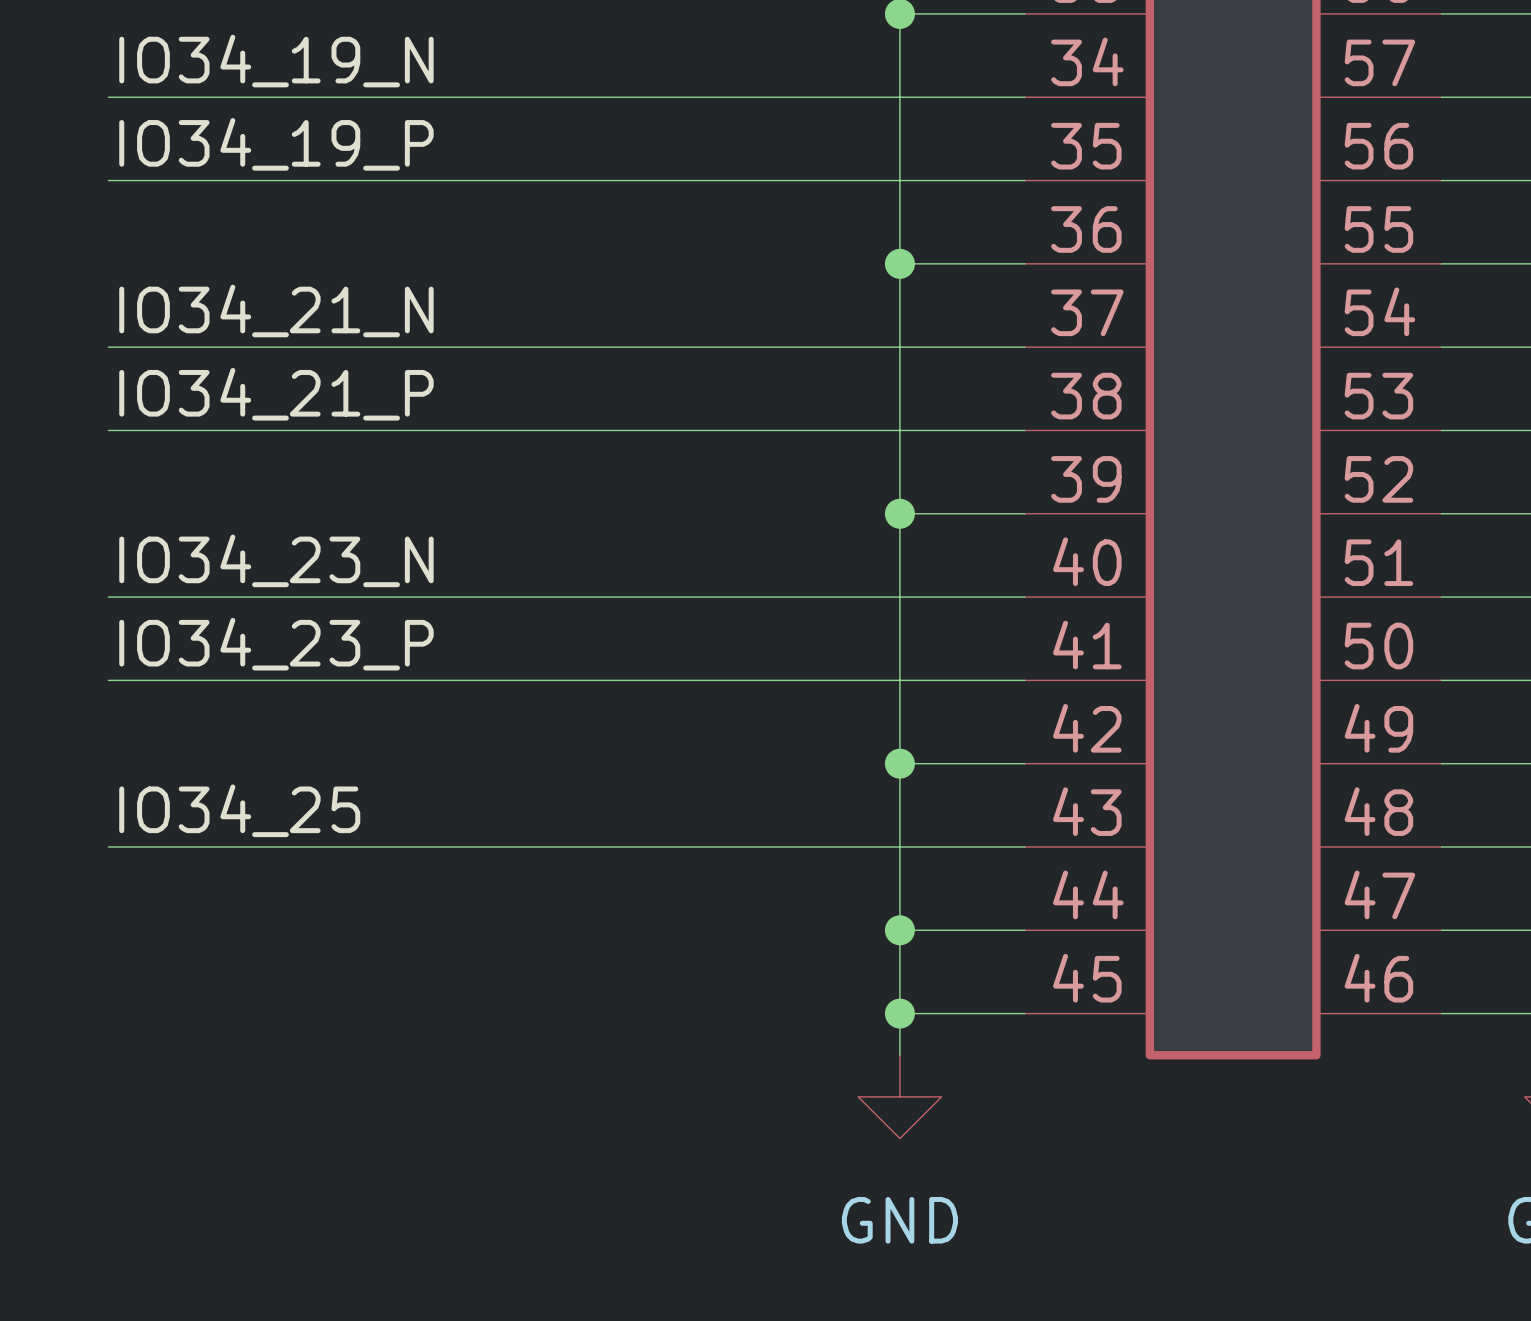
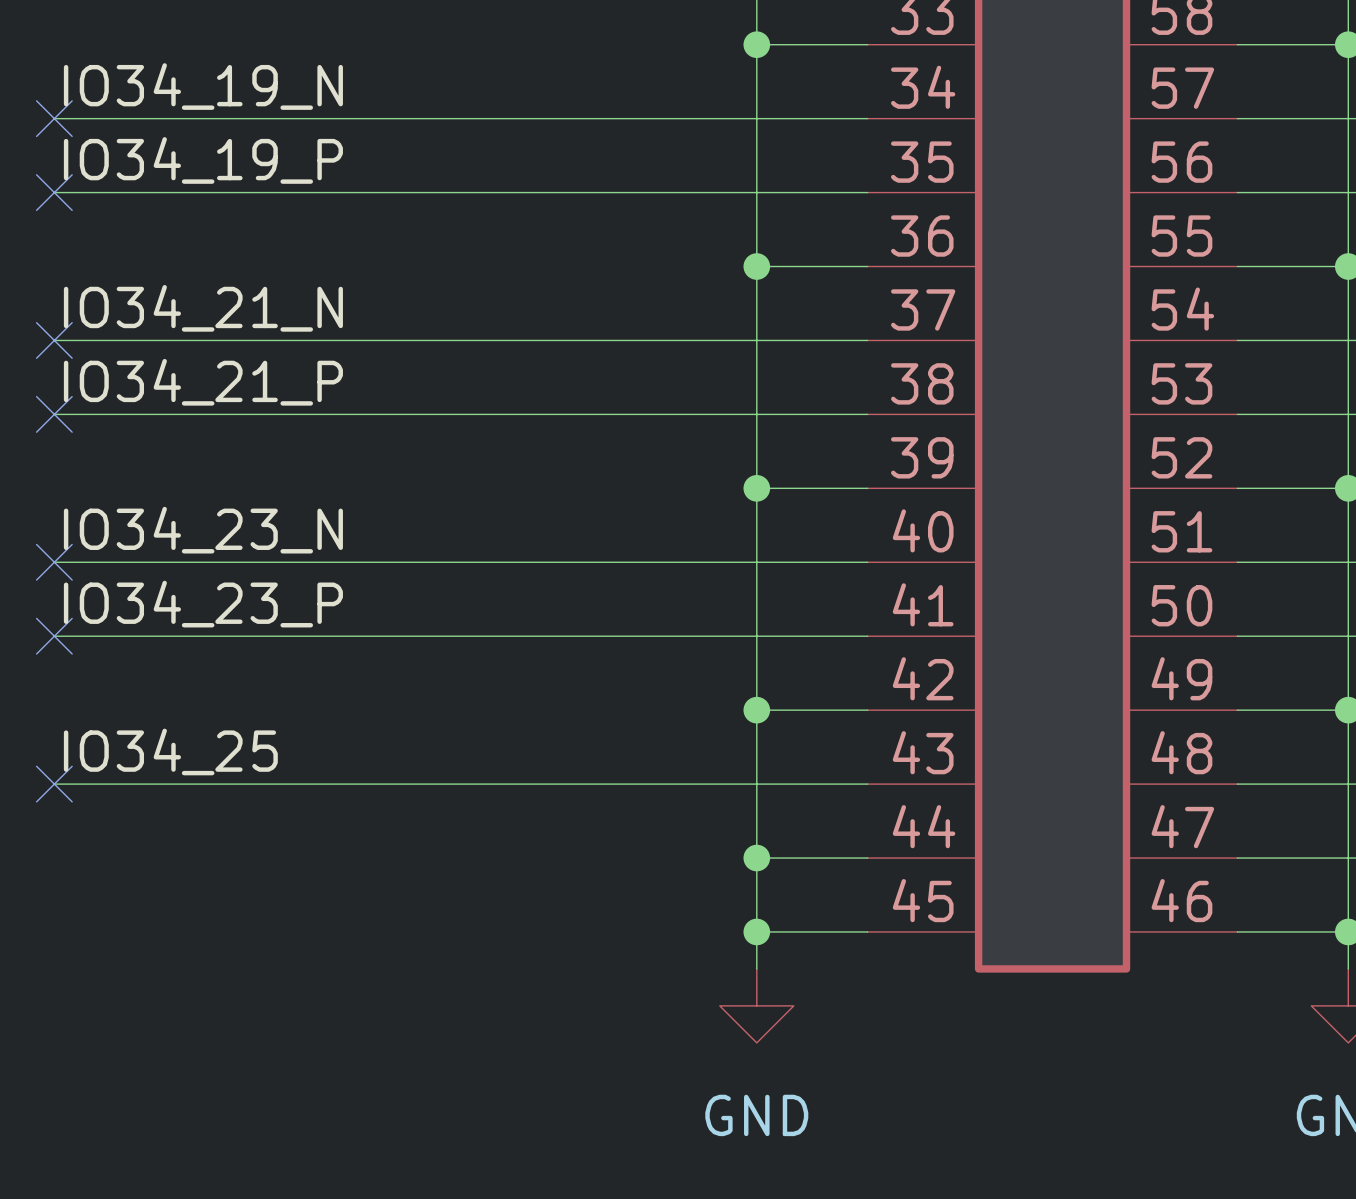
no-connect mark: none -> (54, 118)
no-connect mark: none -> (54, 192)
no-connect mark: none -> (54, 340)
no-connect mark: none -> (54, 414)
no-connect mark: none -> (54, 562)
no-connect mark: none -> (54, 636)
no-connect mark: none -> (54, 784)

